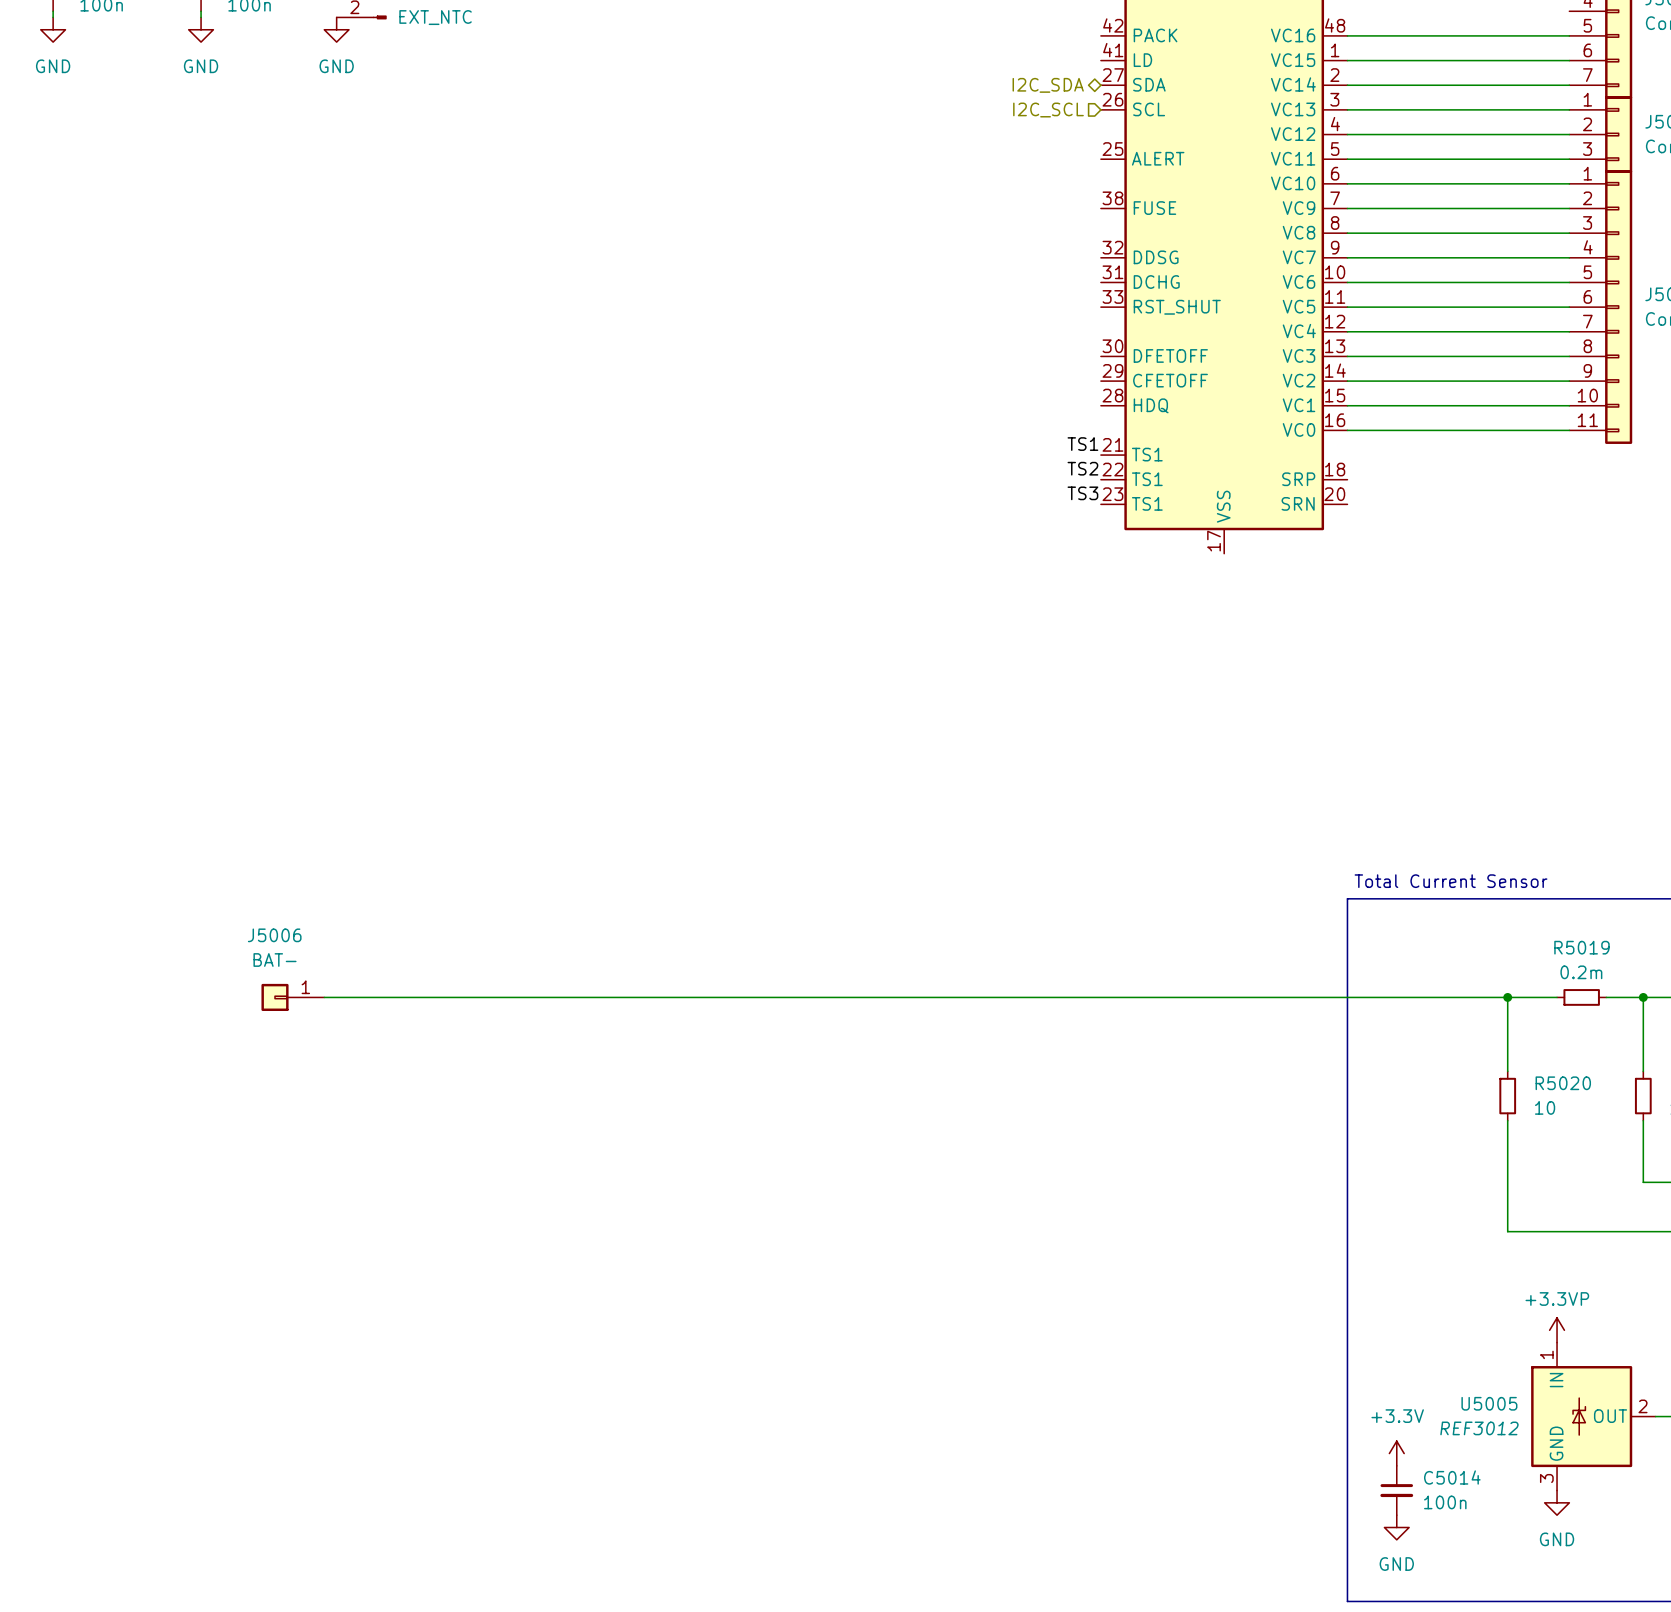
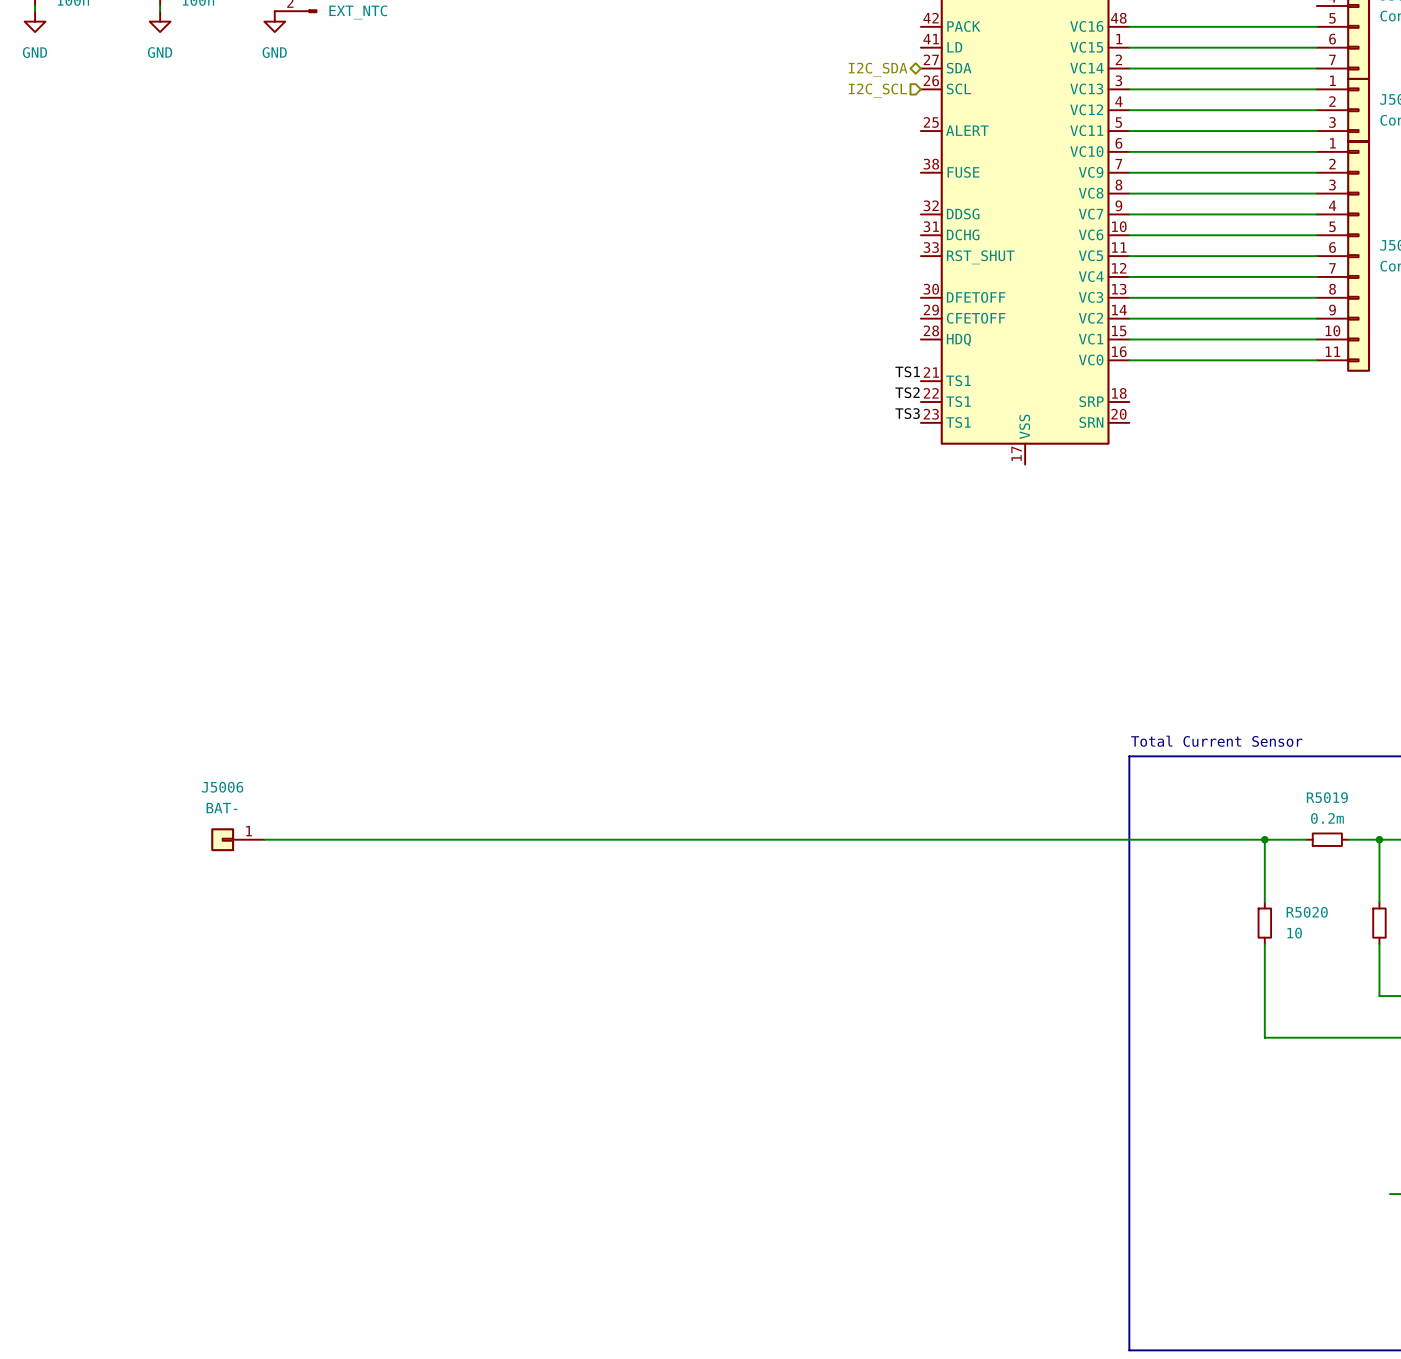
power symbol: +3.3VP (1557, 1330) -> none
U5005: REF3012 (1593, 1416) -> none
power symbol: +3.3V (1396, 1453) -> none
C5014: 100n (1396, 1490) -> none
power symbol: GND (1557, 1502) -> none
power symbol: GND (1396, 1527) -> none

